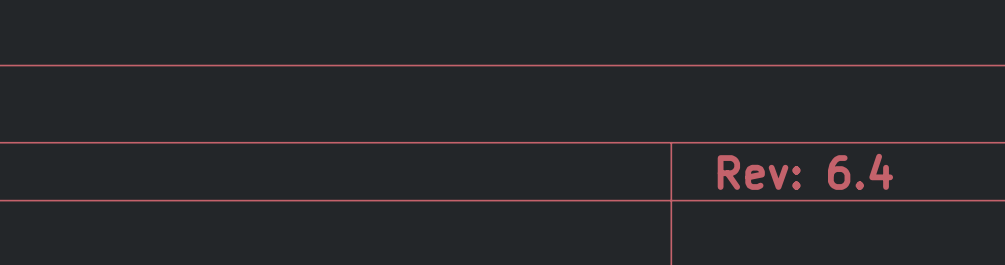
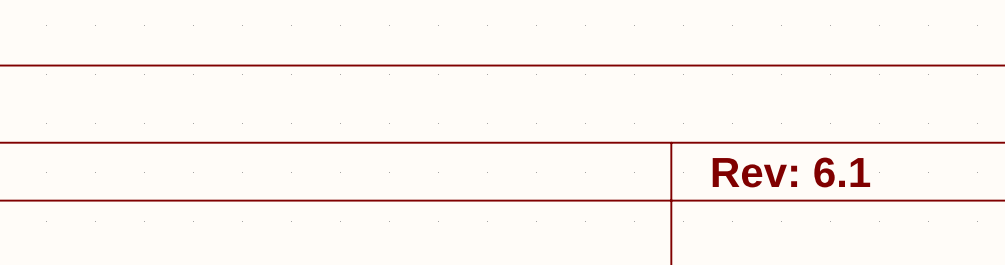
title block: Rev: 6.4 (805, 171) -> Rev: 6.1 (791, 172)

